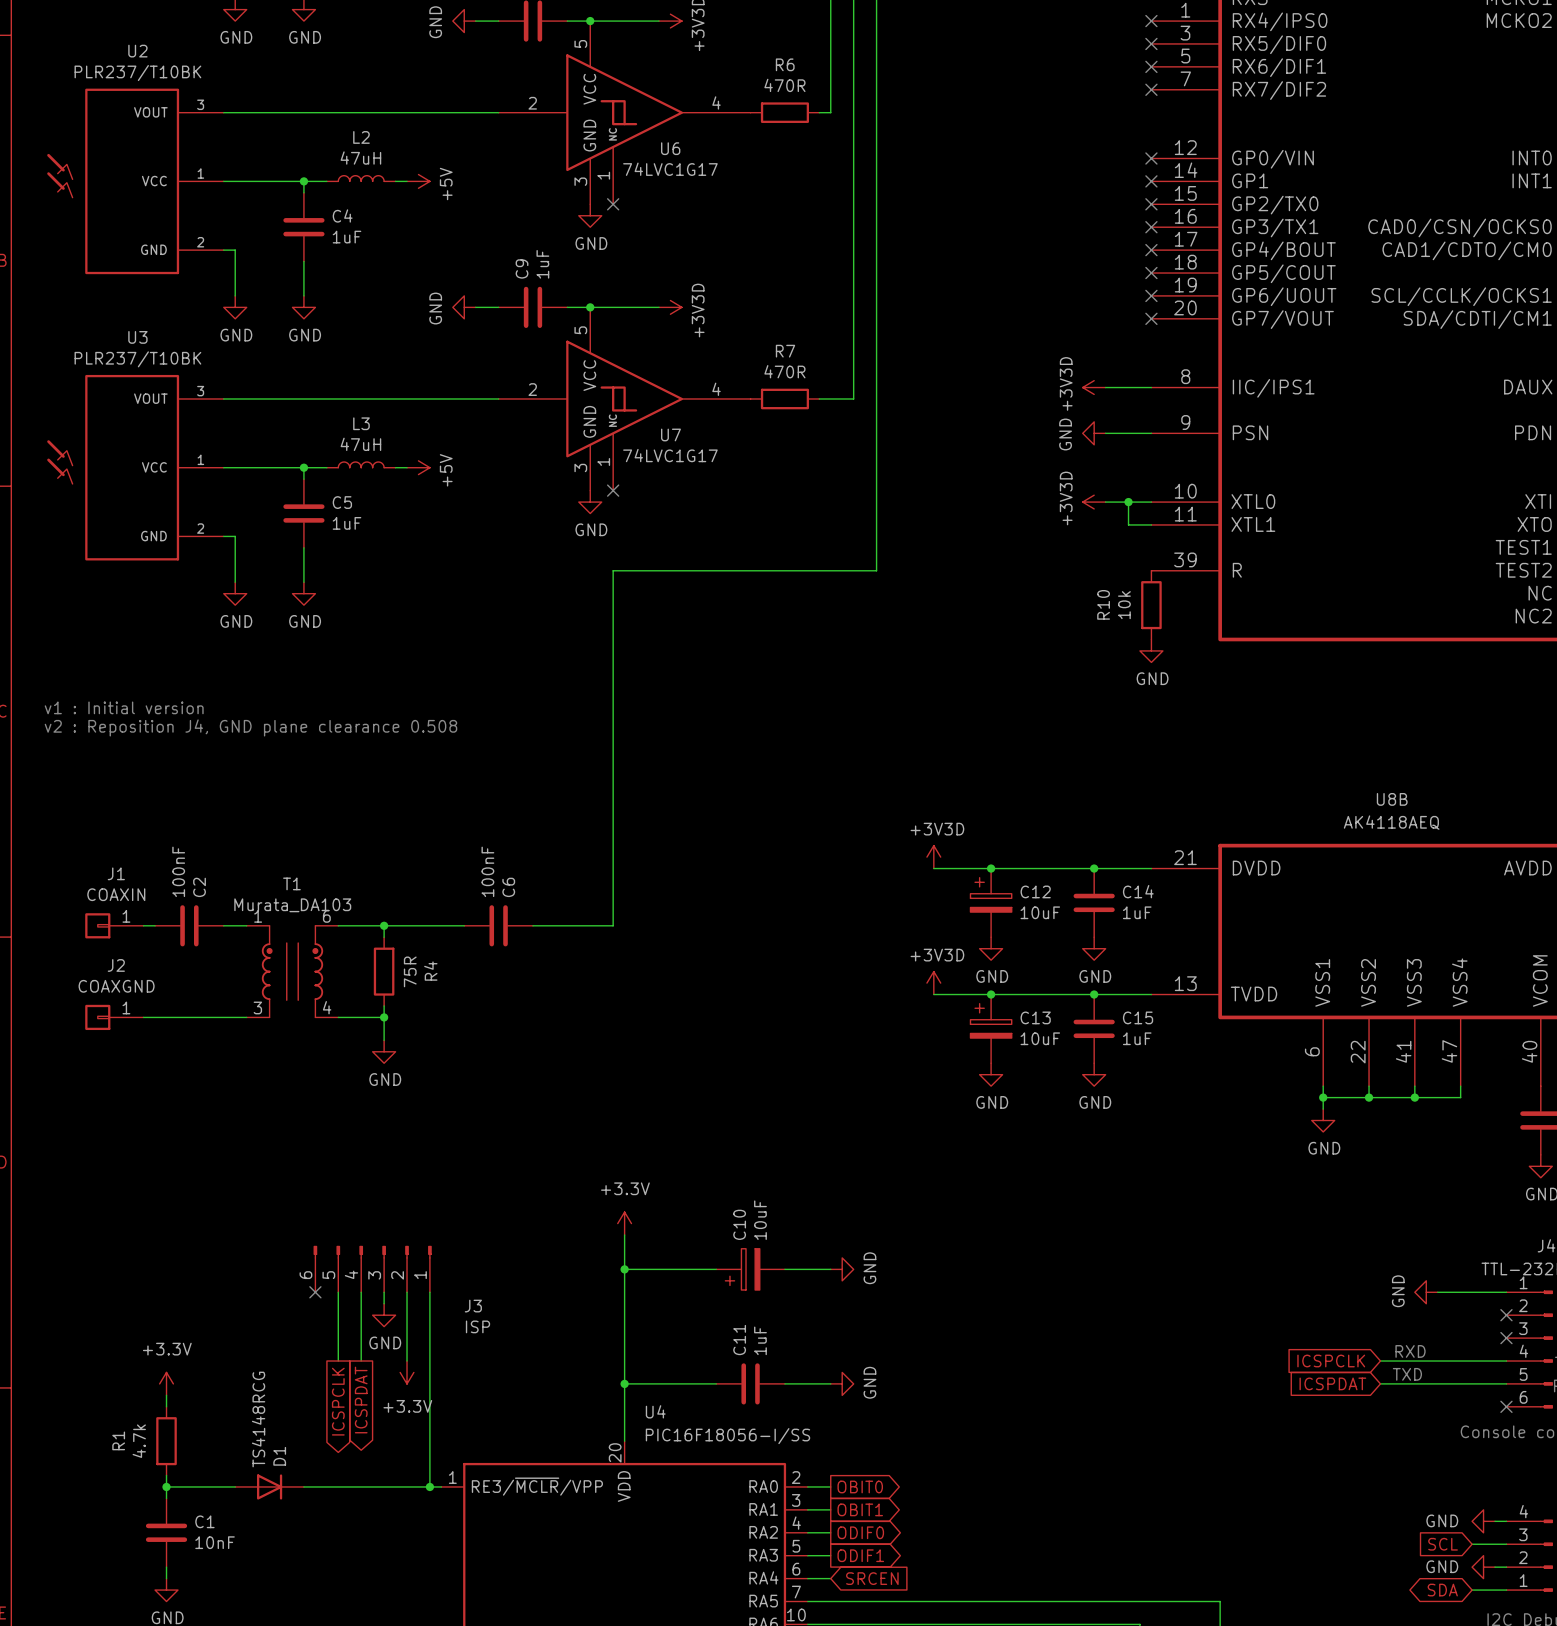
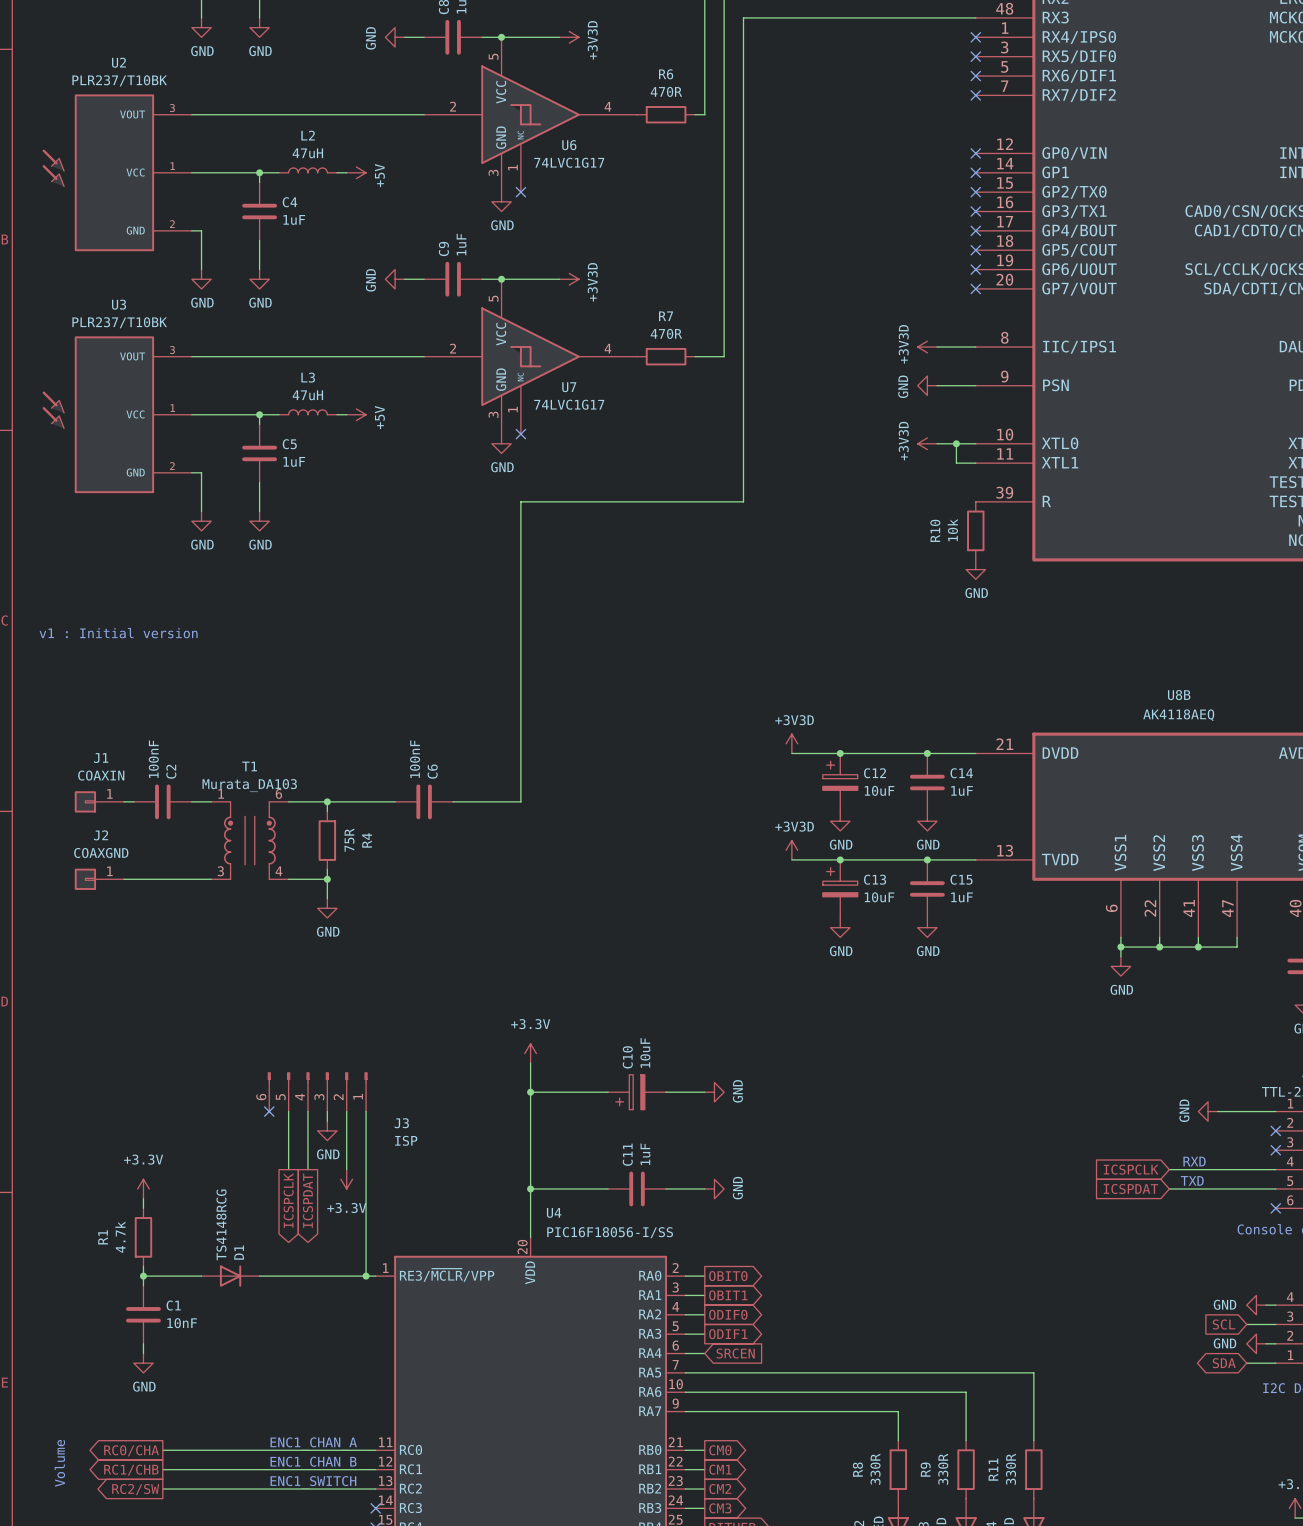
text: v1 : Initial version (124, 707) -> none
text: v2 : Reposition J4, GND plane clearance 0.508 (250, 727) -> v1 : Initial version (118, 633)

